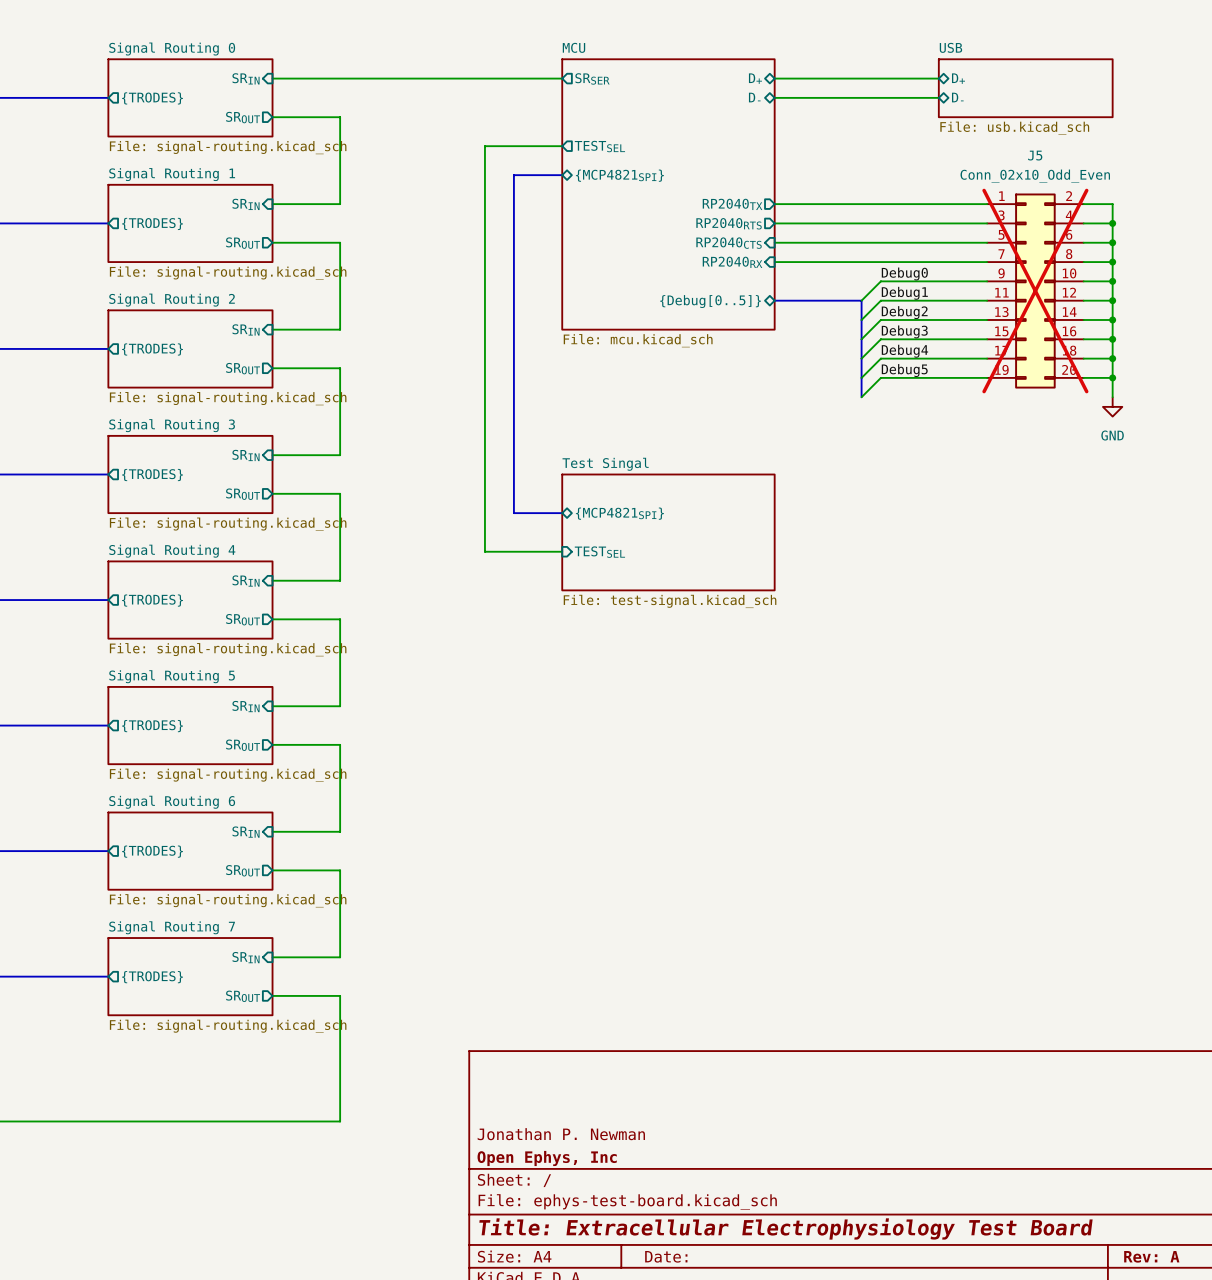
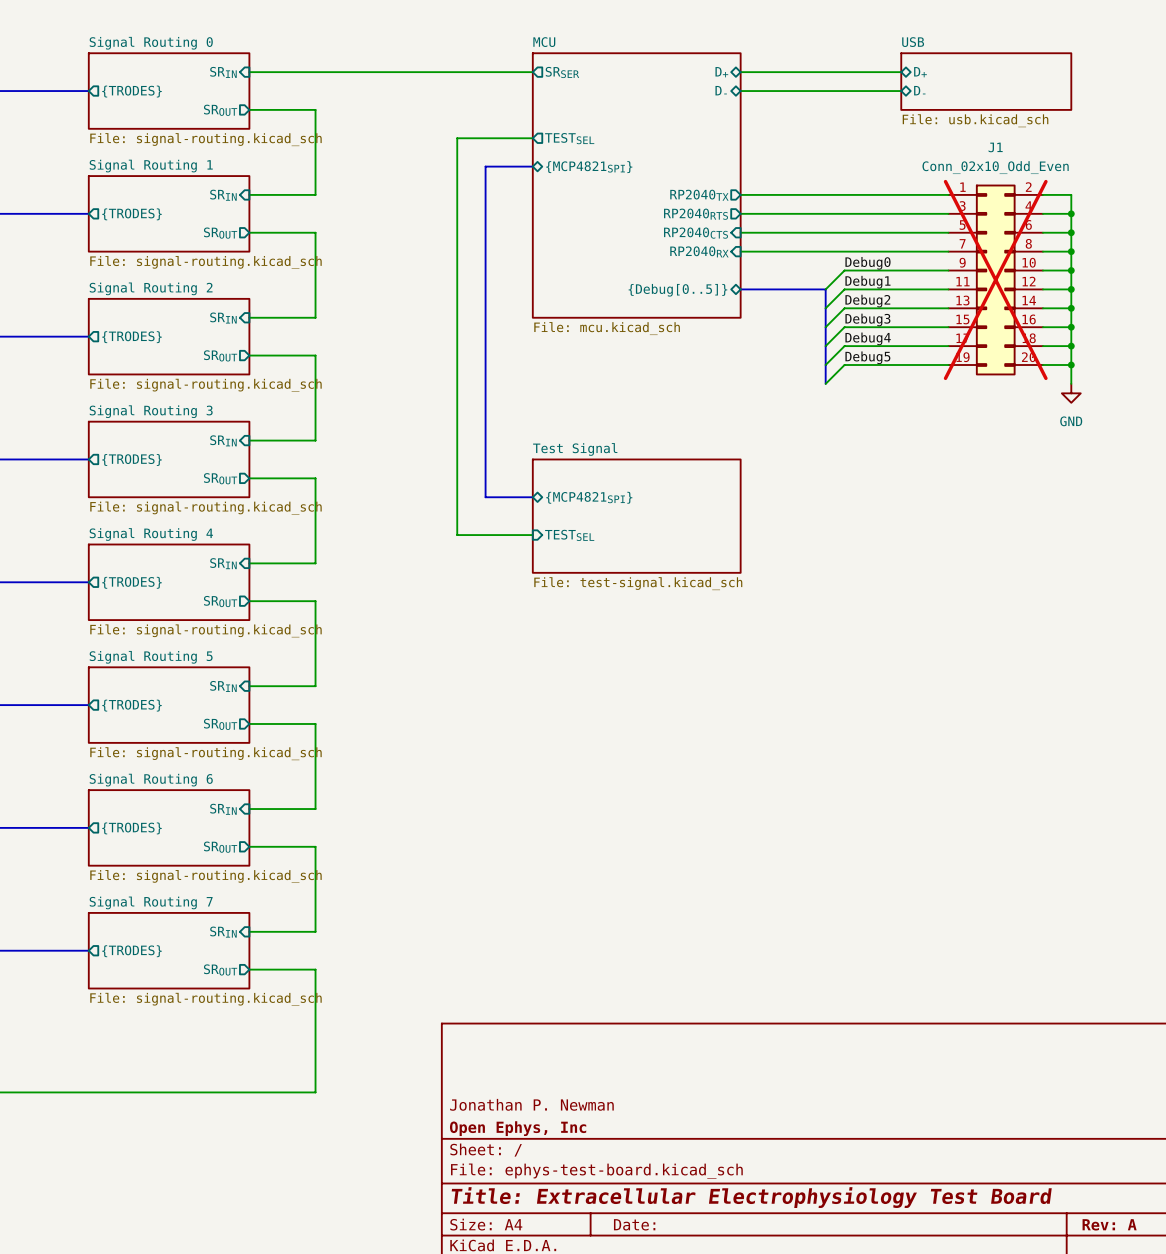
J5 name: J5 (1035, 155) -> J1 (995, 147)
sheet Test Singal name: Test Singal (605, 464) -> Test Signal (575, 449)

